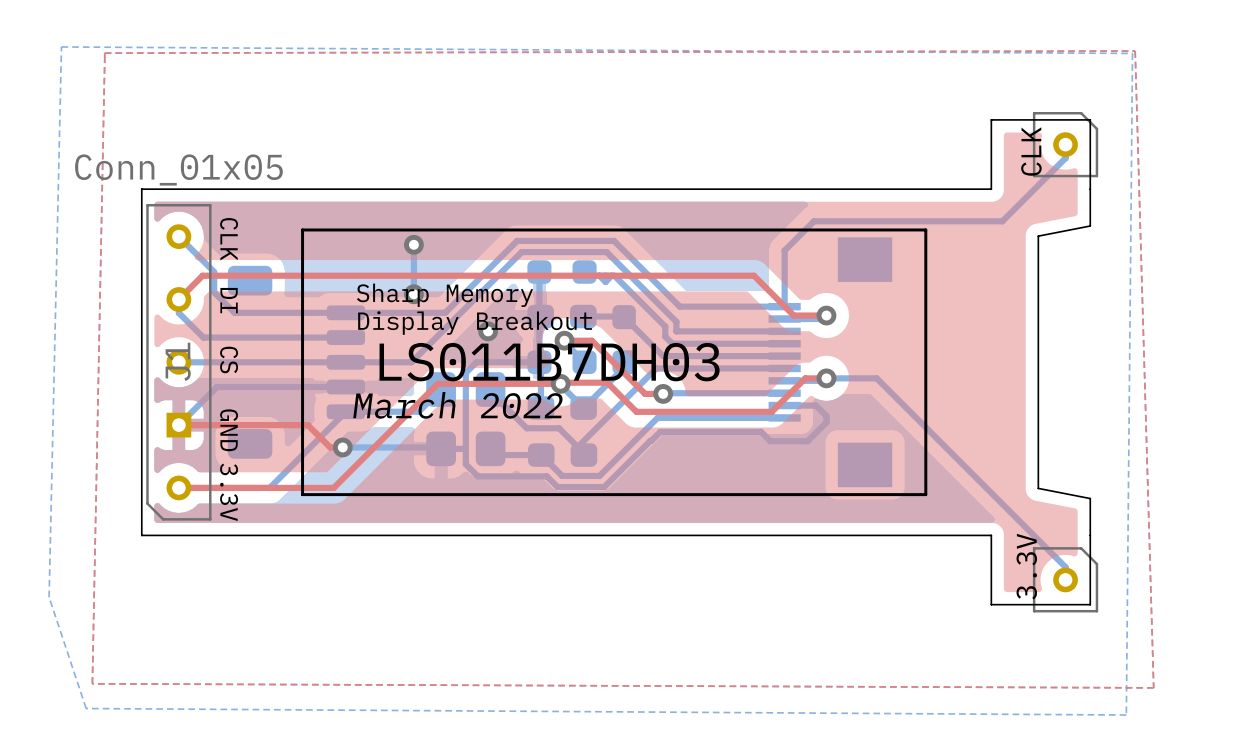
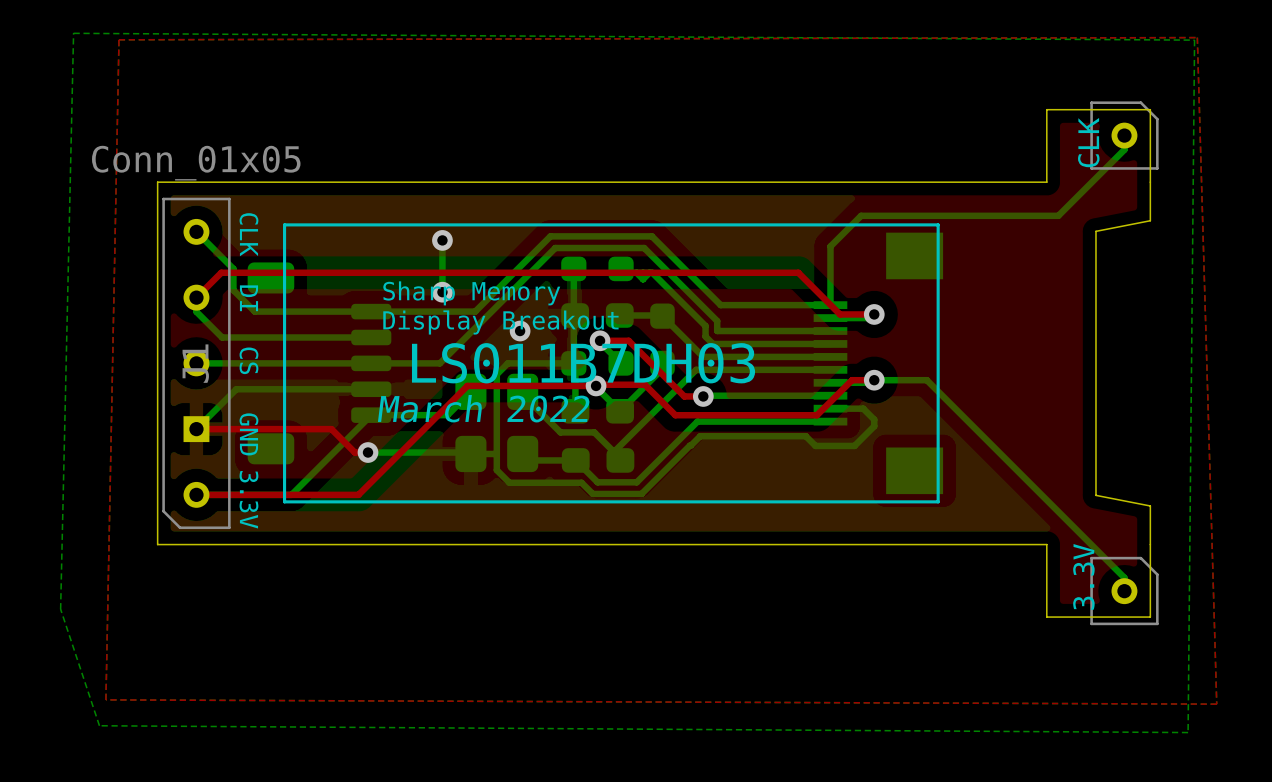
line: (302, 229) (302, 494) -> (325, 224) (284, 224) (284, 501) (325, 501)
line: (887, 229) (925, 229) (925, 494) (887, 494) -> (938, 224) (938, 501)

